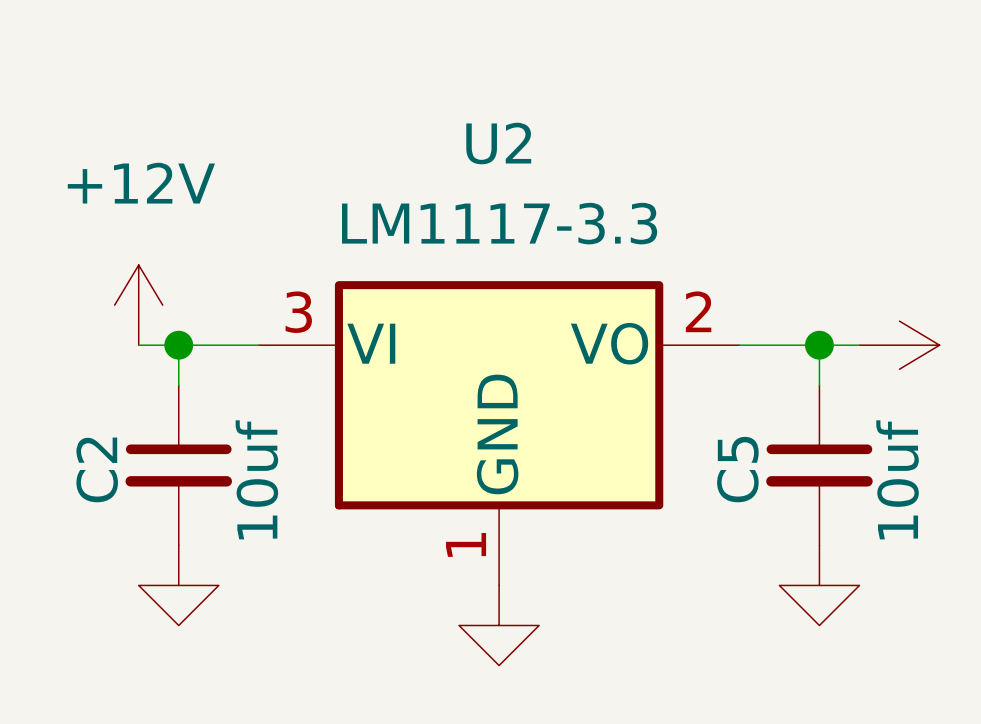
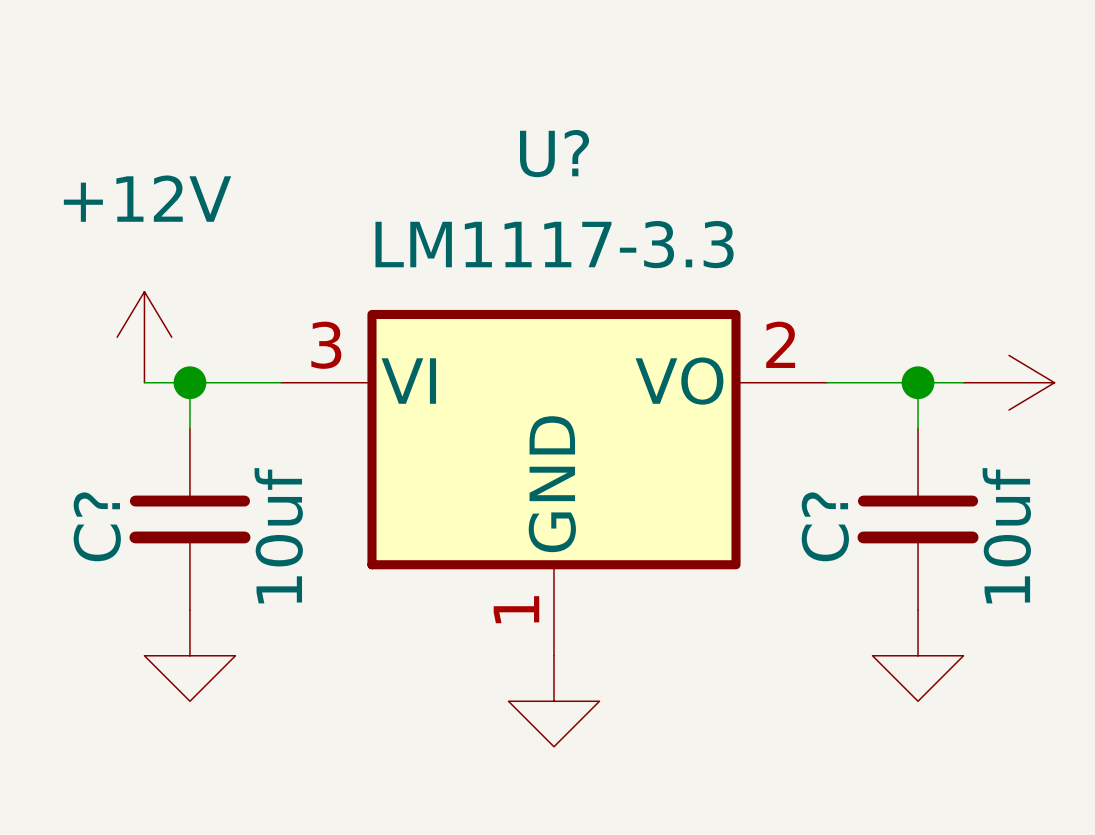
U2 name: U2 (498, 143) -> U? (554, 153)
C2 name: C2 (97, 469) -> C? (97, 526)
C5 name: C5 (737, 469) -> C? (825, 526)

